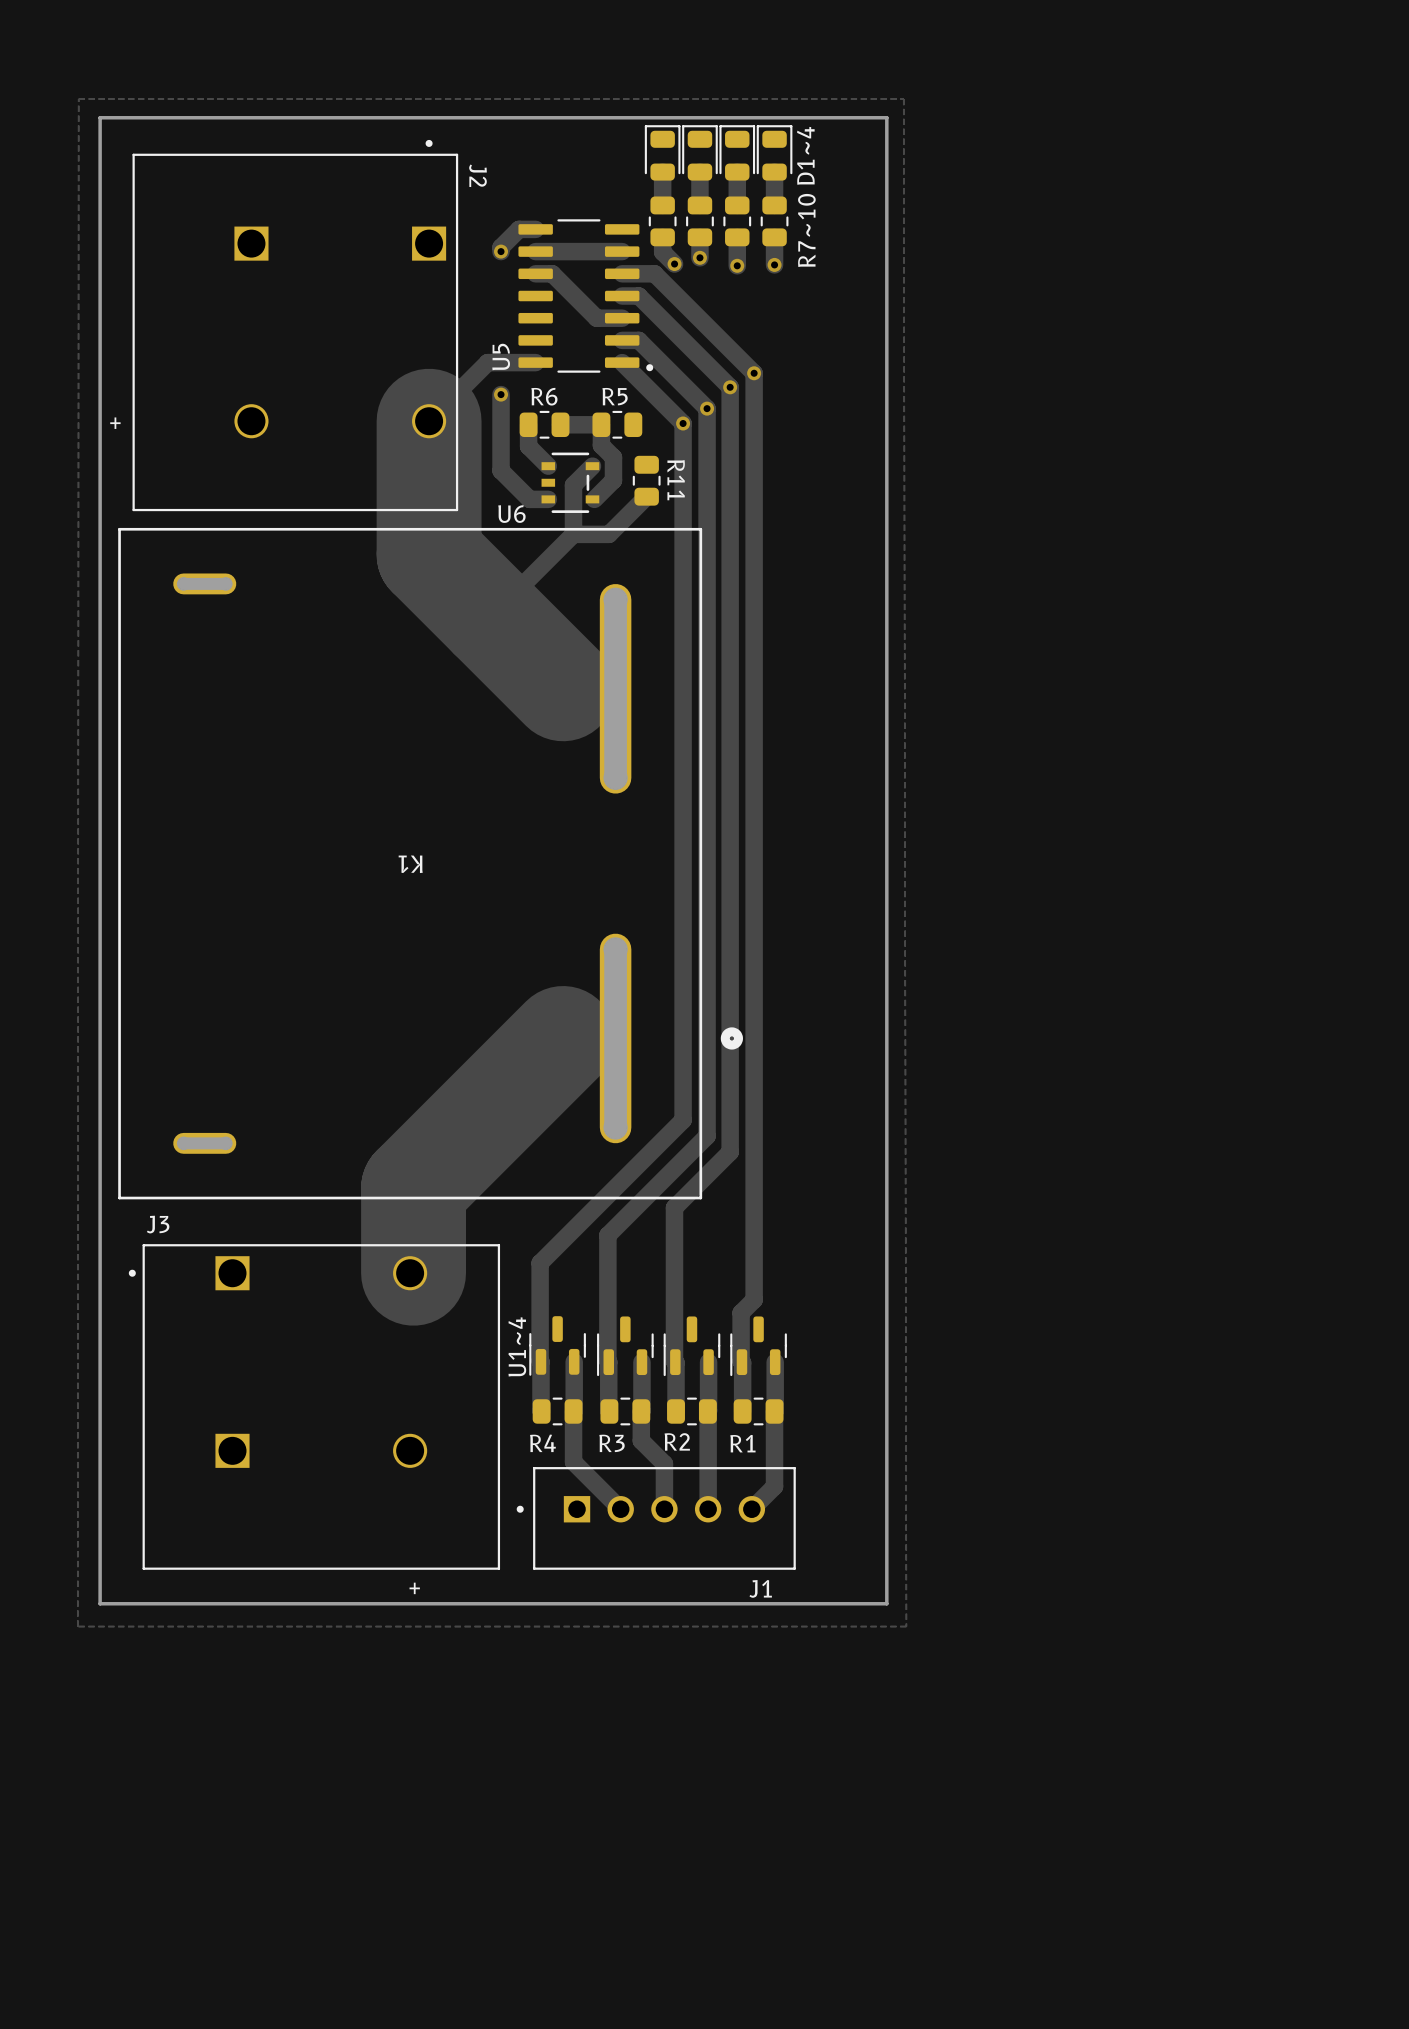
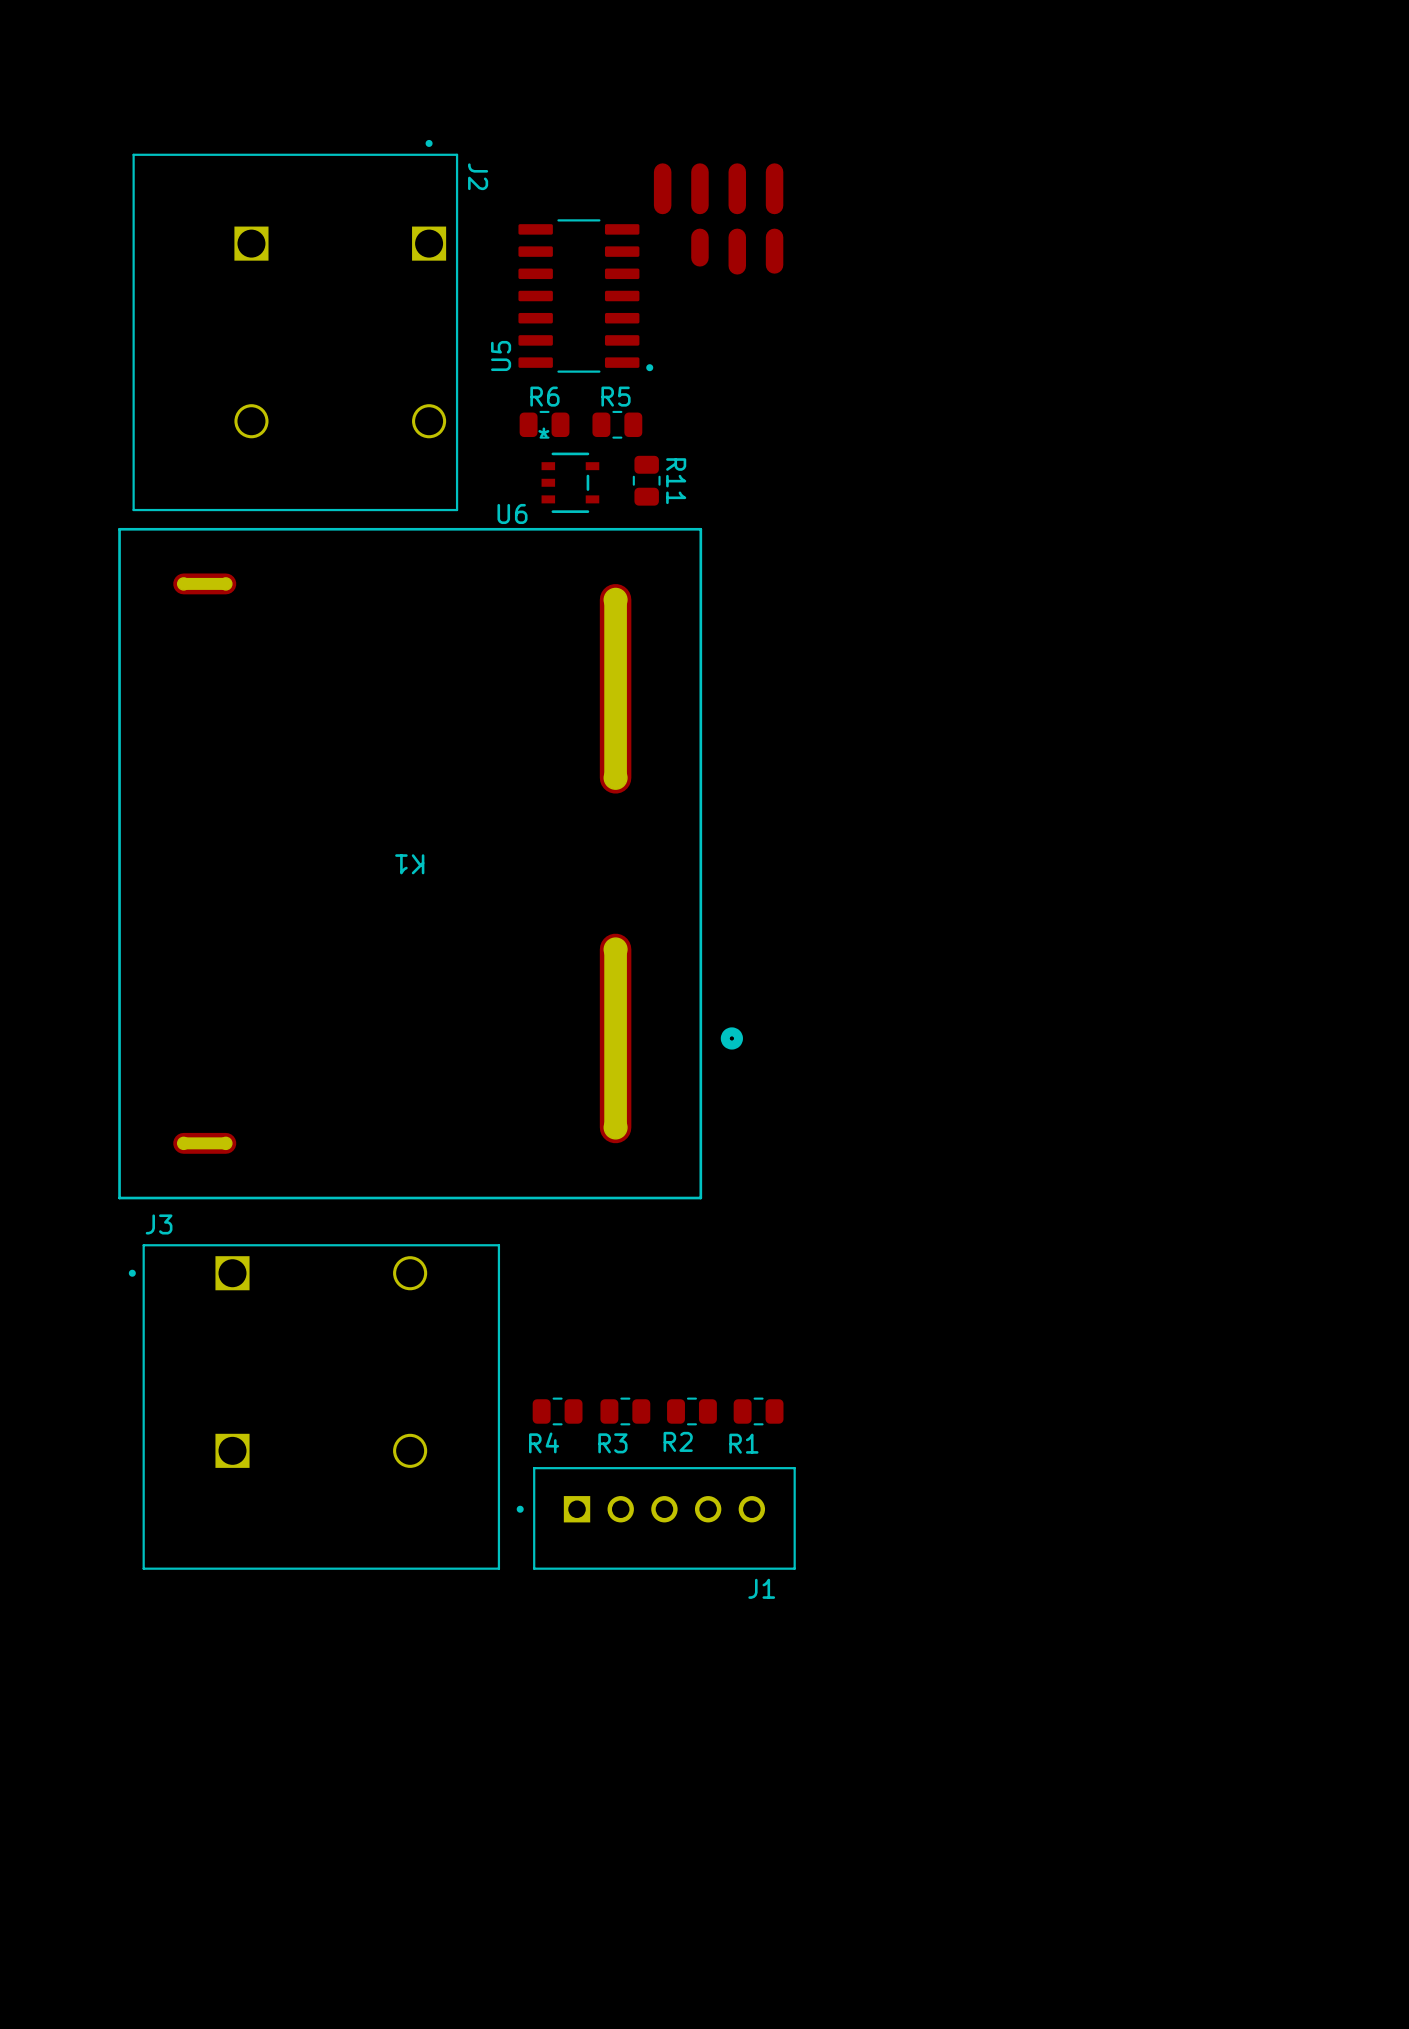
zone outline: (78, 98) (903, 98) (906, 1626) (77, 1626) (78, 98) -> none
board edge: (100, 117) (886, 117) (886, 1603) (100, 1603) (100, 117) -> none
part: (662, 152) -> none
part: (699, 152) -> none
part: (737, 152) -> none
D1~4: (774, 152) -> none
part: (662, 221) -> none
part: (699, 221) -> none
part: (737, 221) -> none
R7~10: (774, 221) -> none
track: (535, 229) (519, 229) (501, 247) (501, 251) -> none
track: (662, 237) (662, 252) (674, 264) -> none
via: (501, 251) -> none
track: (535, 251) (622, 251) -> none
via: (699, 257) -> none
via: (674, 264) -> none
via: (774, 264) -> none
via: (737, 265) -> none
track: (535, 273) (552, 273) (596, 318) (622, 318) -> none
track: (622, 273) (654, 273) (754, 373) (754, 1299) (741, 1312) (742, 1411) -> none
track: (622, 296) (638, 296) (730, 387) (730, 1152) (674, 1207) (676, 1411) -> none
track: (622, 340) (638, 340) (707, 408) (707, 1136) (607, 1235) (609, 1411) -> none
track: (535, 362) (487, 362) (429, 421) (429, 554) (563, 688) -> none
track: (622, 362) (683, 423) (683, 1120) (540, 1263) (541, 1411) -> none
via: (754, 373) -> none
via: (730, 387) -> none
track: (501, 394) (501, 470) (529, 499) (548, 499) -> none
via: (501, 394) -> none
via: (707, 408) -> none
text: + (115, 423) -> none
via: (683, 423) -> none
track: (528, 424) (528, 446) (548, 466) -> none
track: (560, 424) (601, 424) (601, 445) (613, 457) (613, 480) (594, 499) -> none
U6 text: none -> * (543, 432)
track: (592, 466) (573, 485) (573, 534) -> none
track: (646, 496) (608, 534) (573, 534) -> none
track: (573, 534) (491, 616) -> none
track: (563, 1038) (413, 1188) (413, 1273) -> none
part: (557, 1345) -> none
part: (625, 1346) -> none
part: (691, 1346) -> none
U1~4: (758, 1346) -> none
track: (574, 1361) (573, 1462) (620, 1509) -> none
track: (641, 1362) (641, 1440) (664, 1463) (664, 1509) -> none
track: (708, 1362) (707, 1411) -> none
track: (775, 1362) (774, 1486) (751, 1509) -> none
track: (708, 1411) (708, 1509) -> none
text: + (414, 1588) -> none

